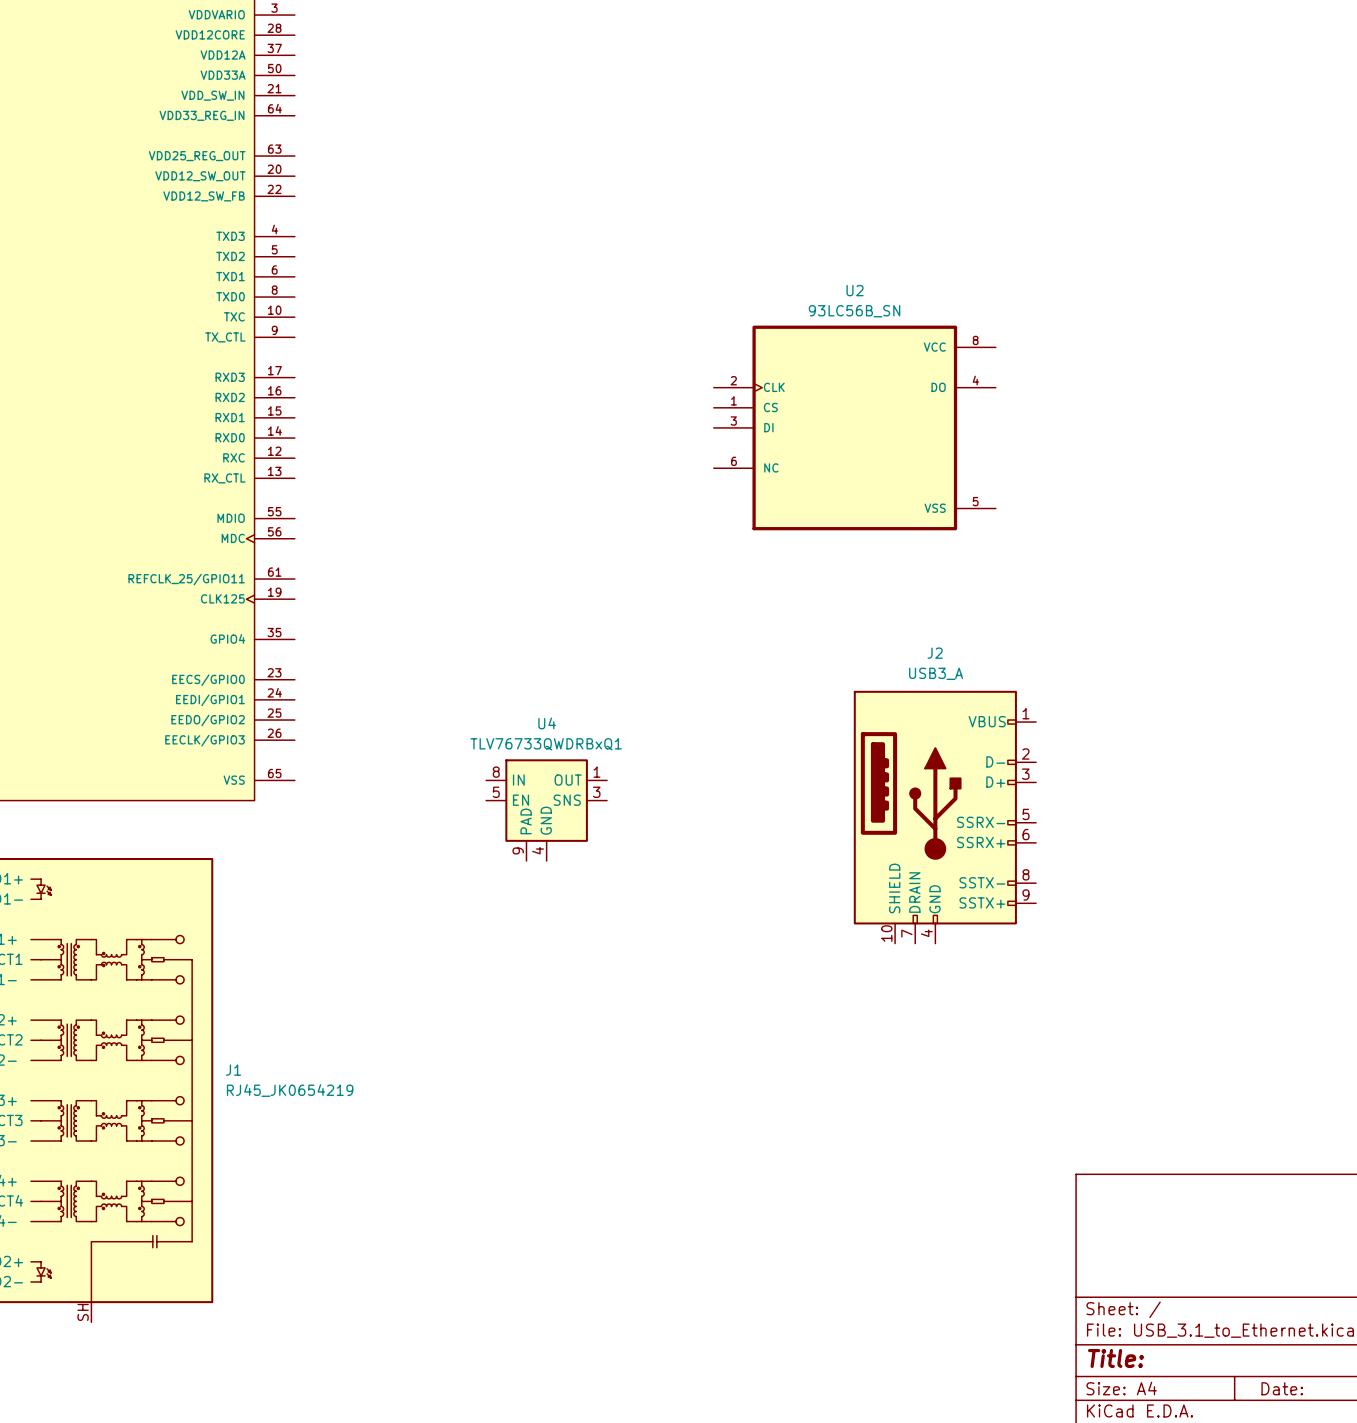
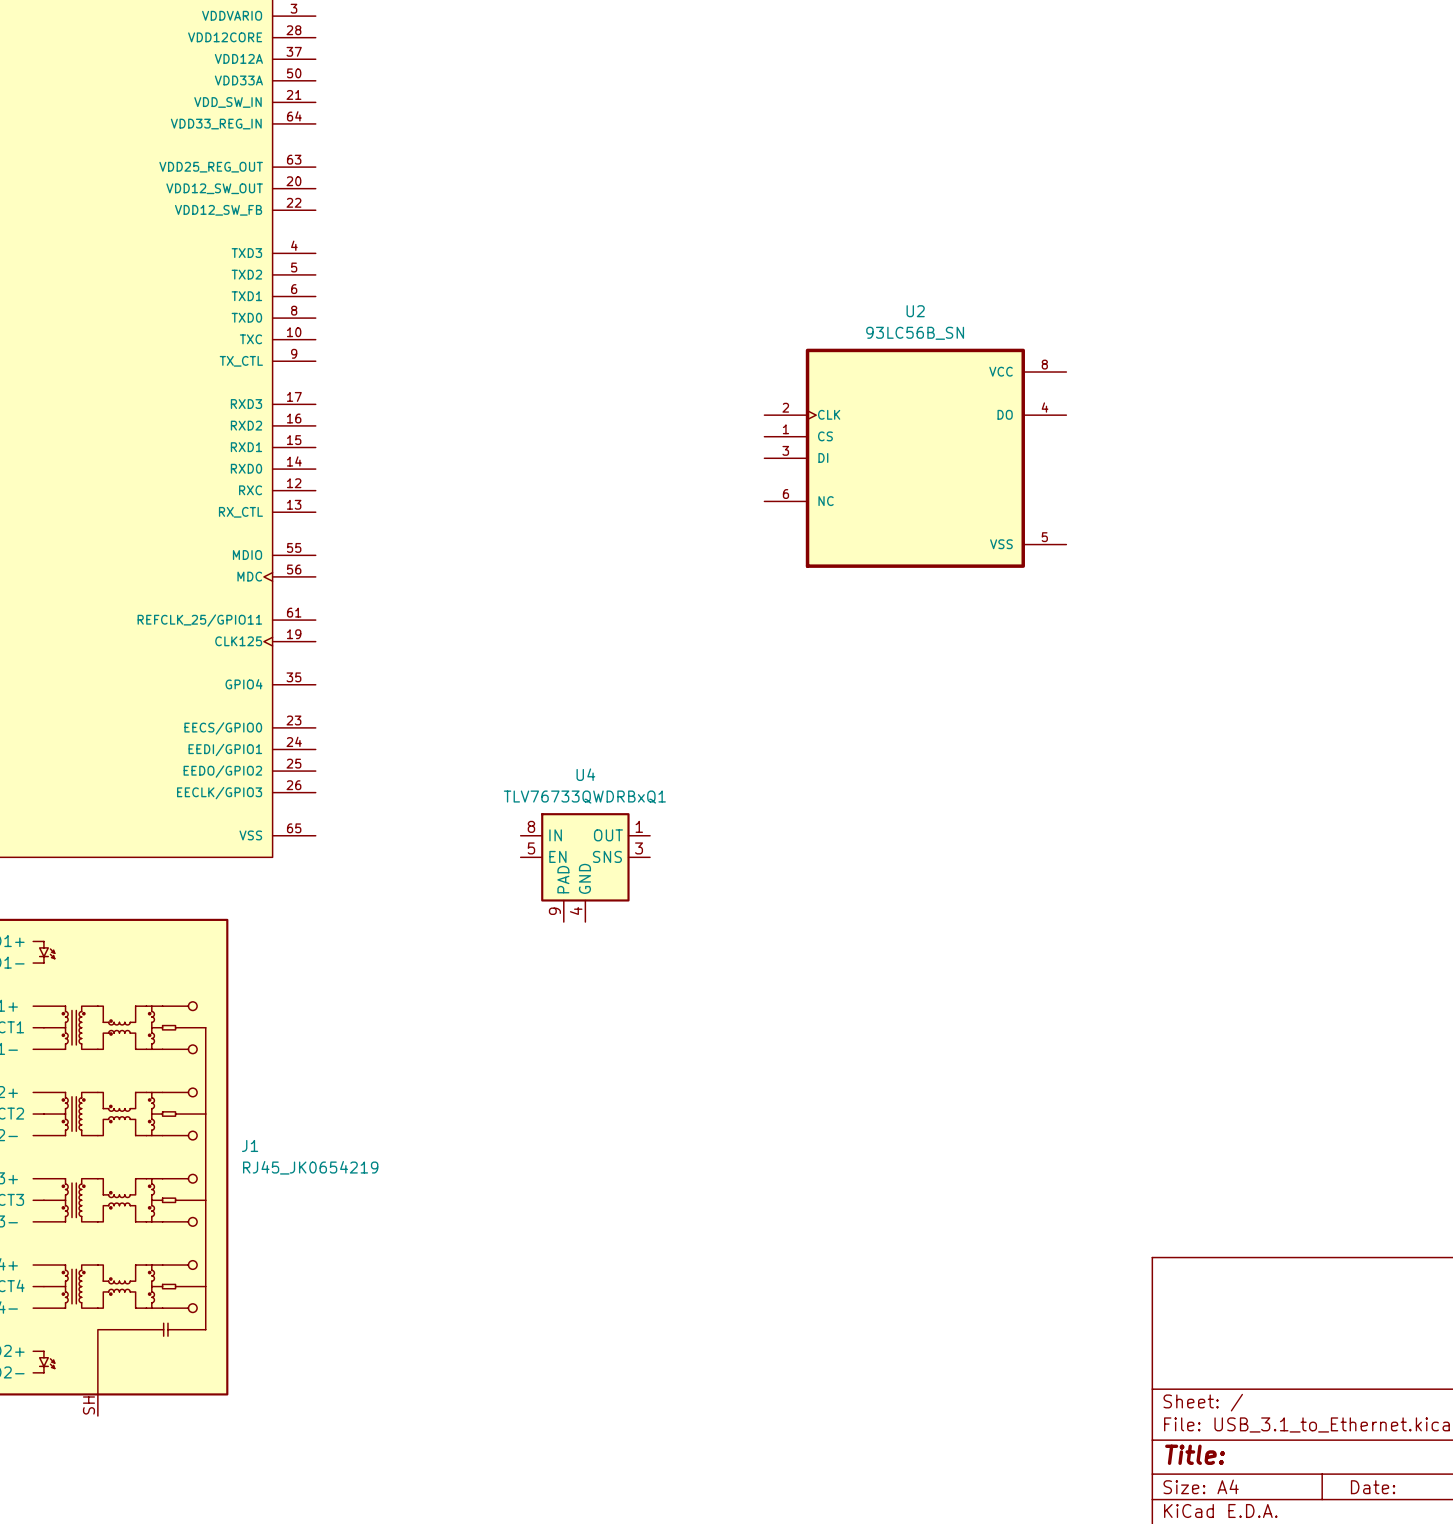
J2: USB3_A (944, 817) -> none

